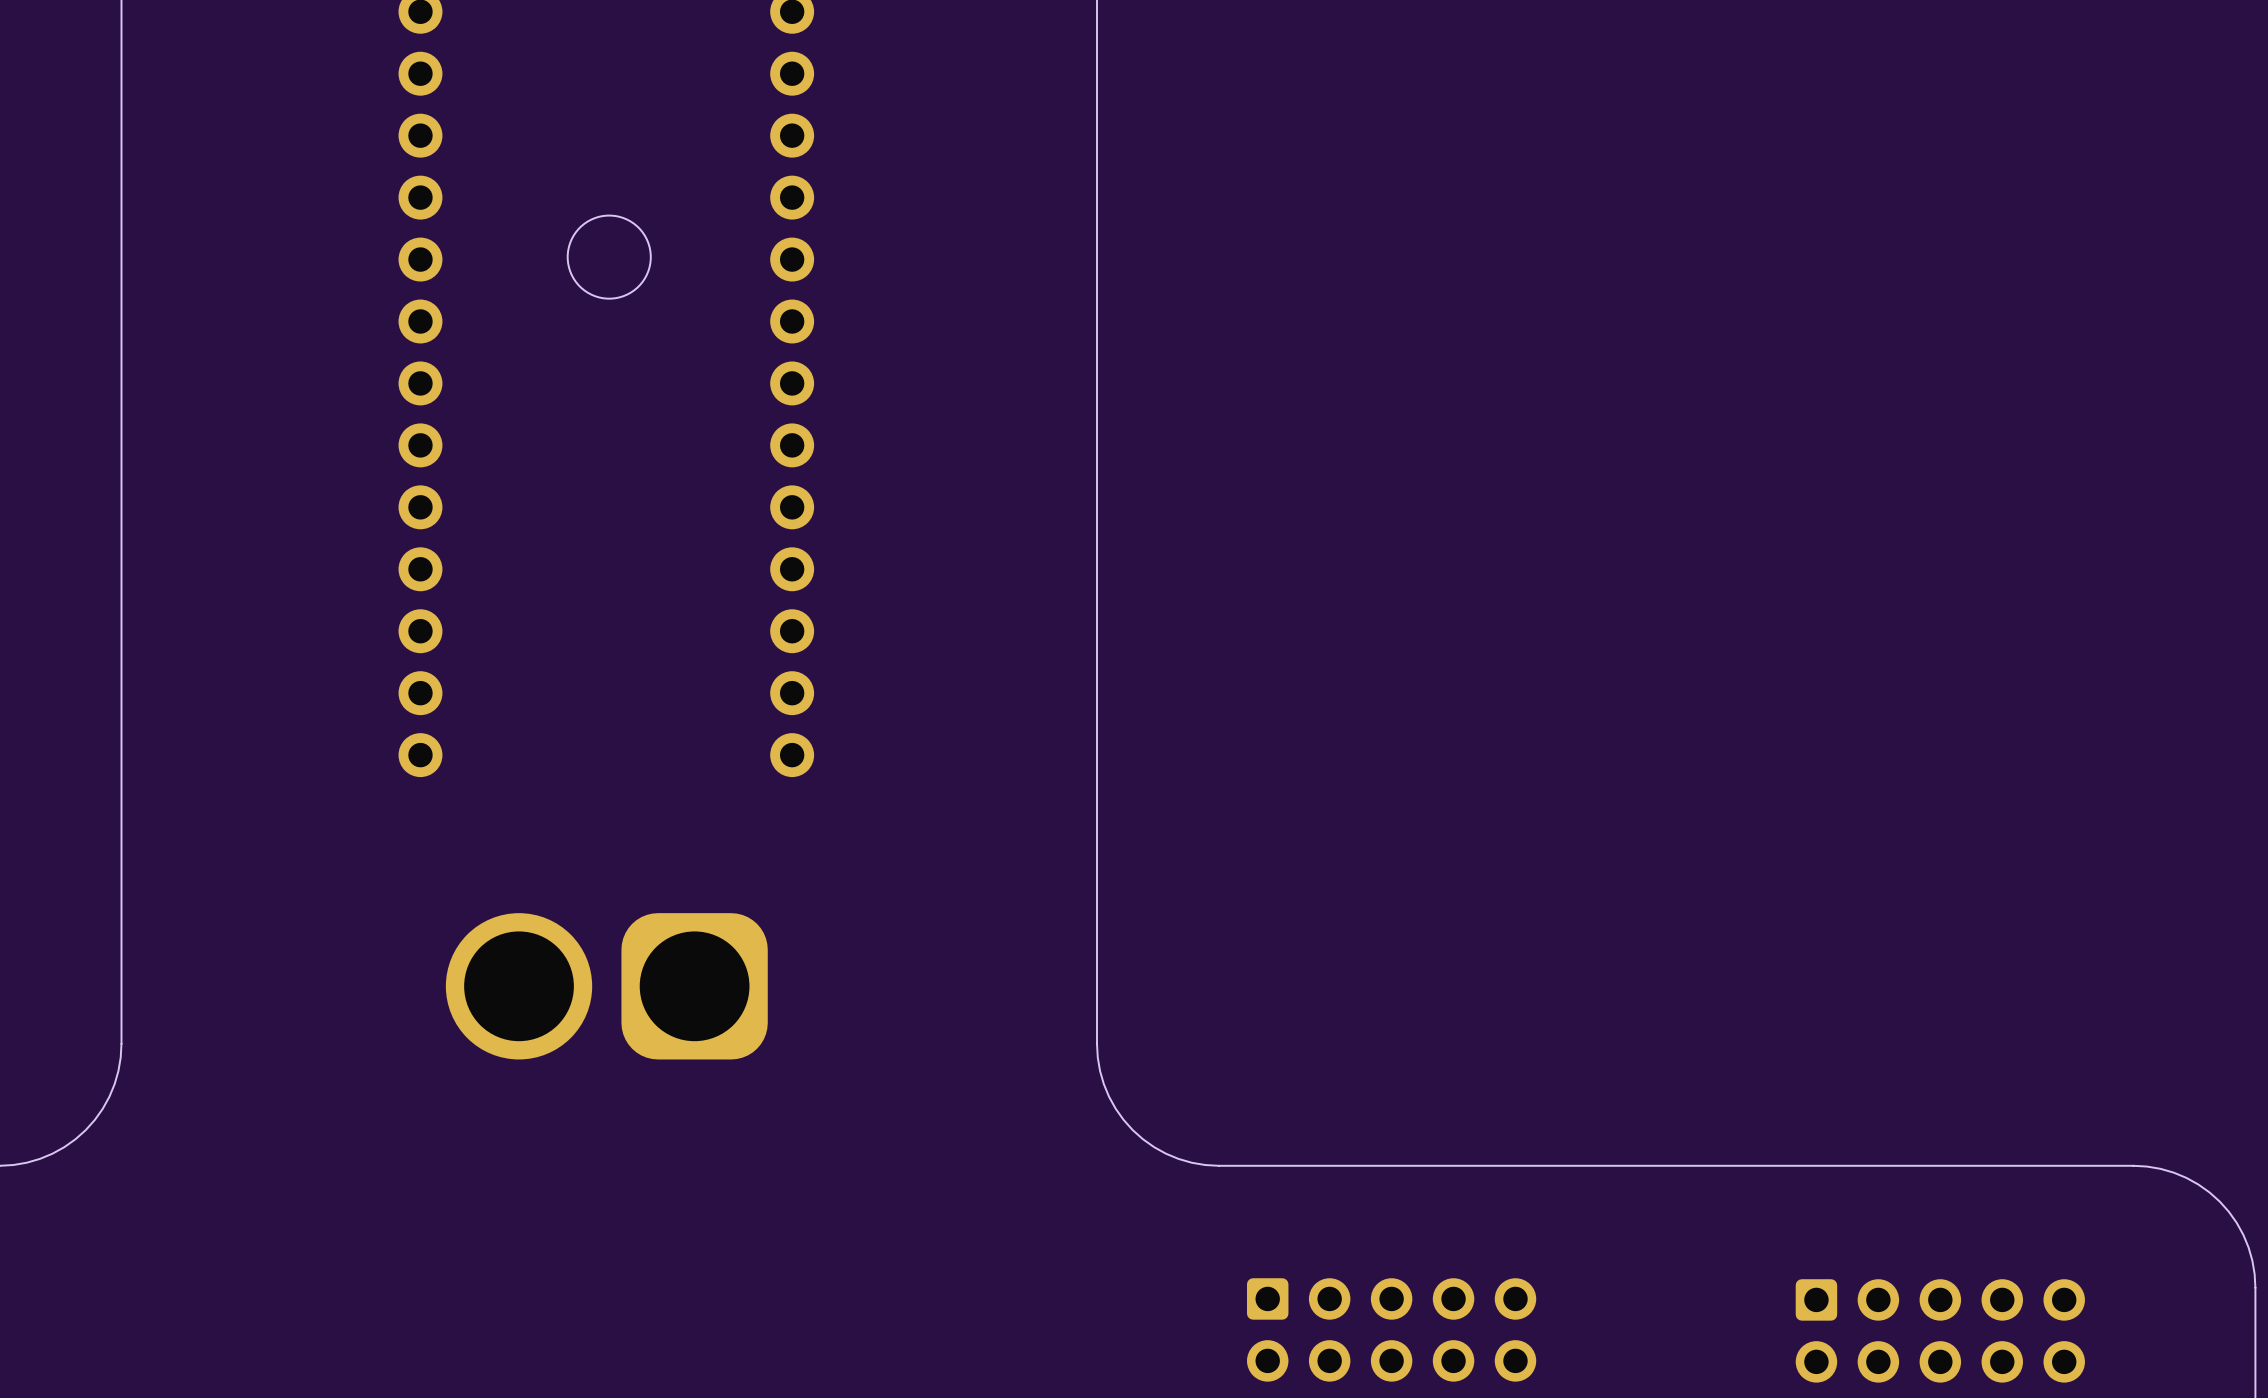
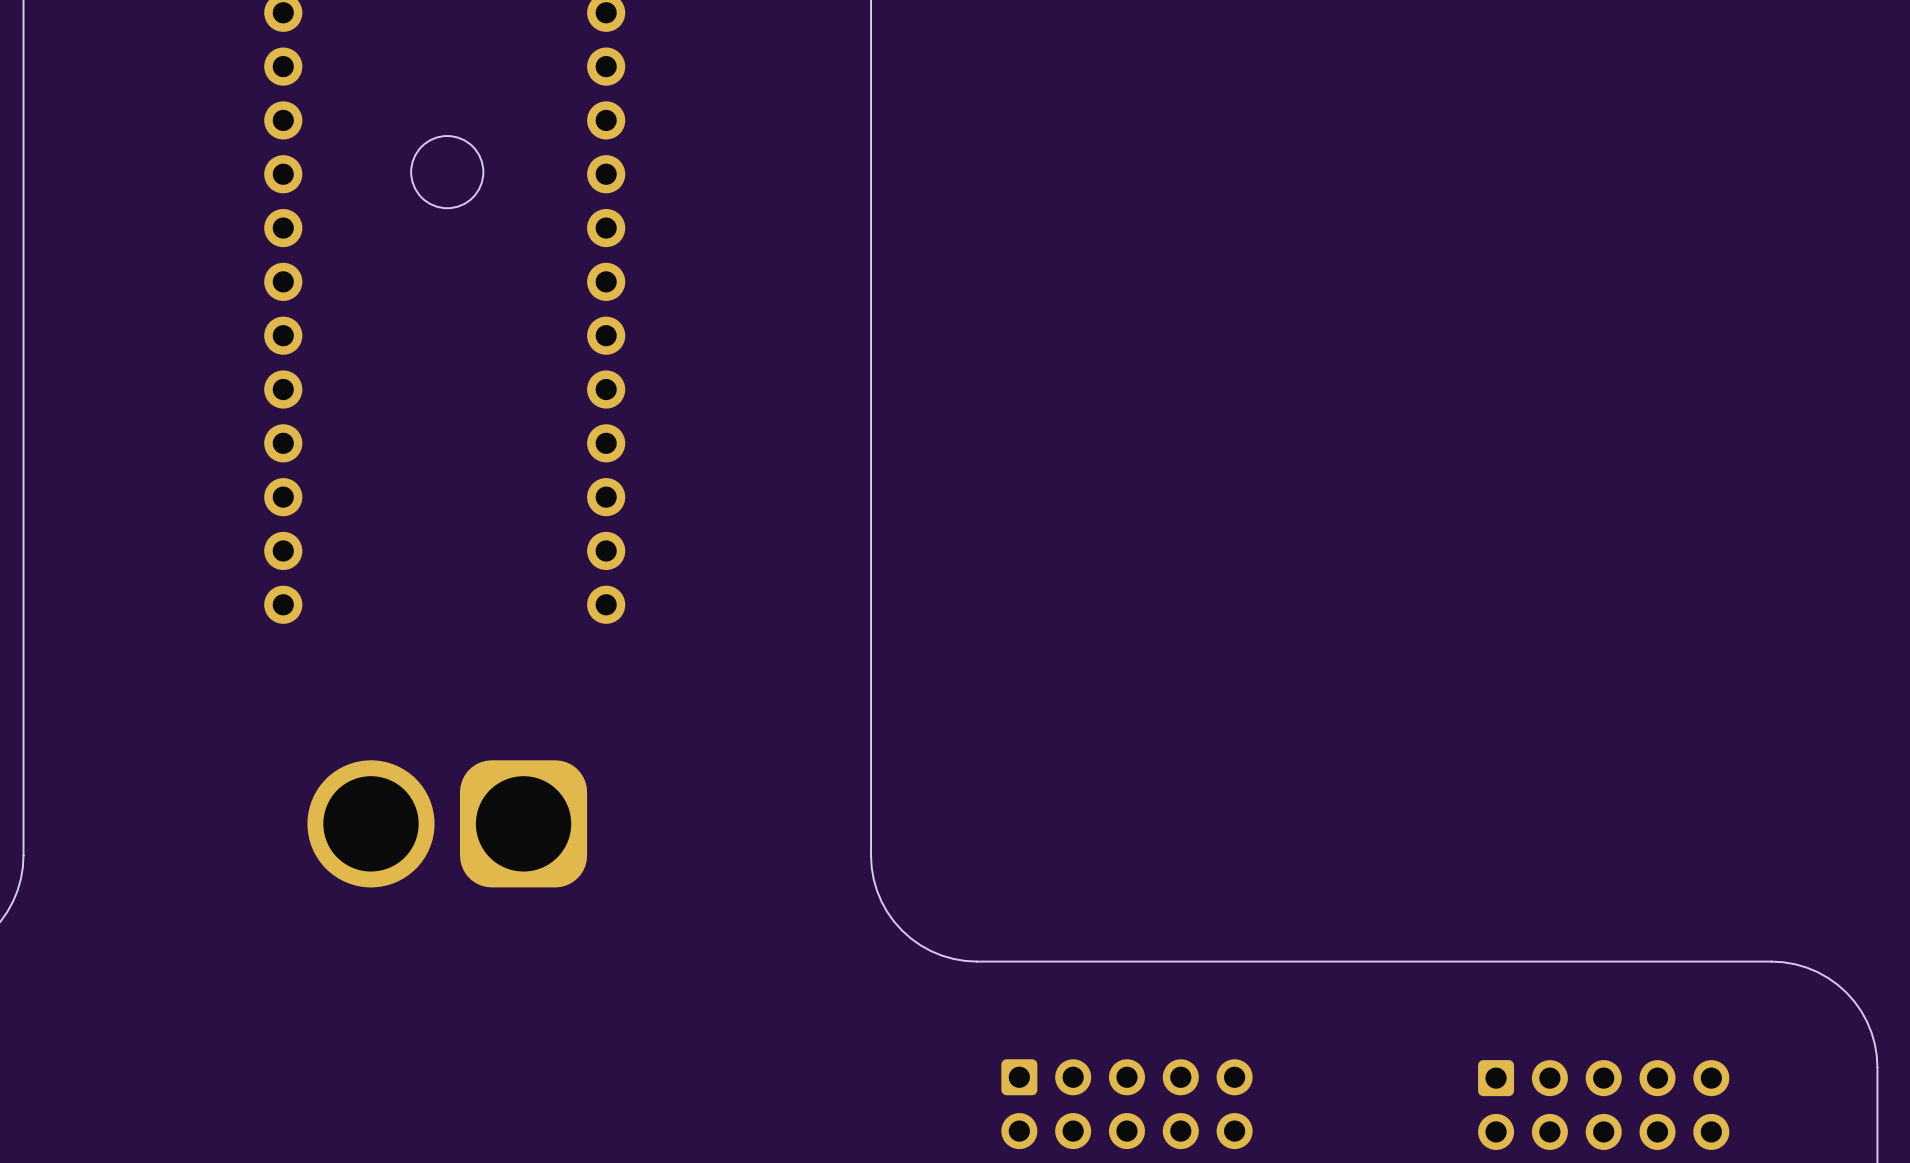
part position: (606, 986) -> (447, 823)

